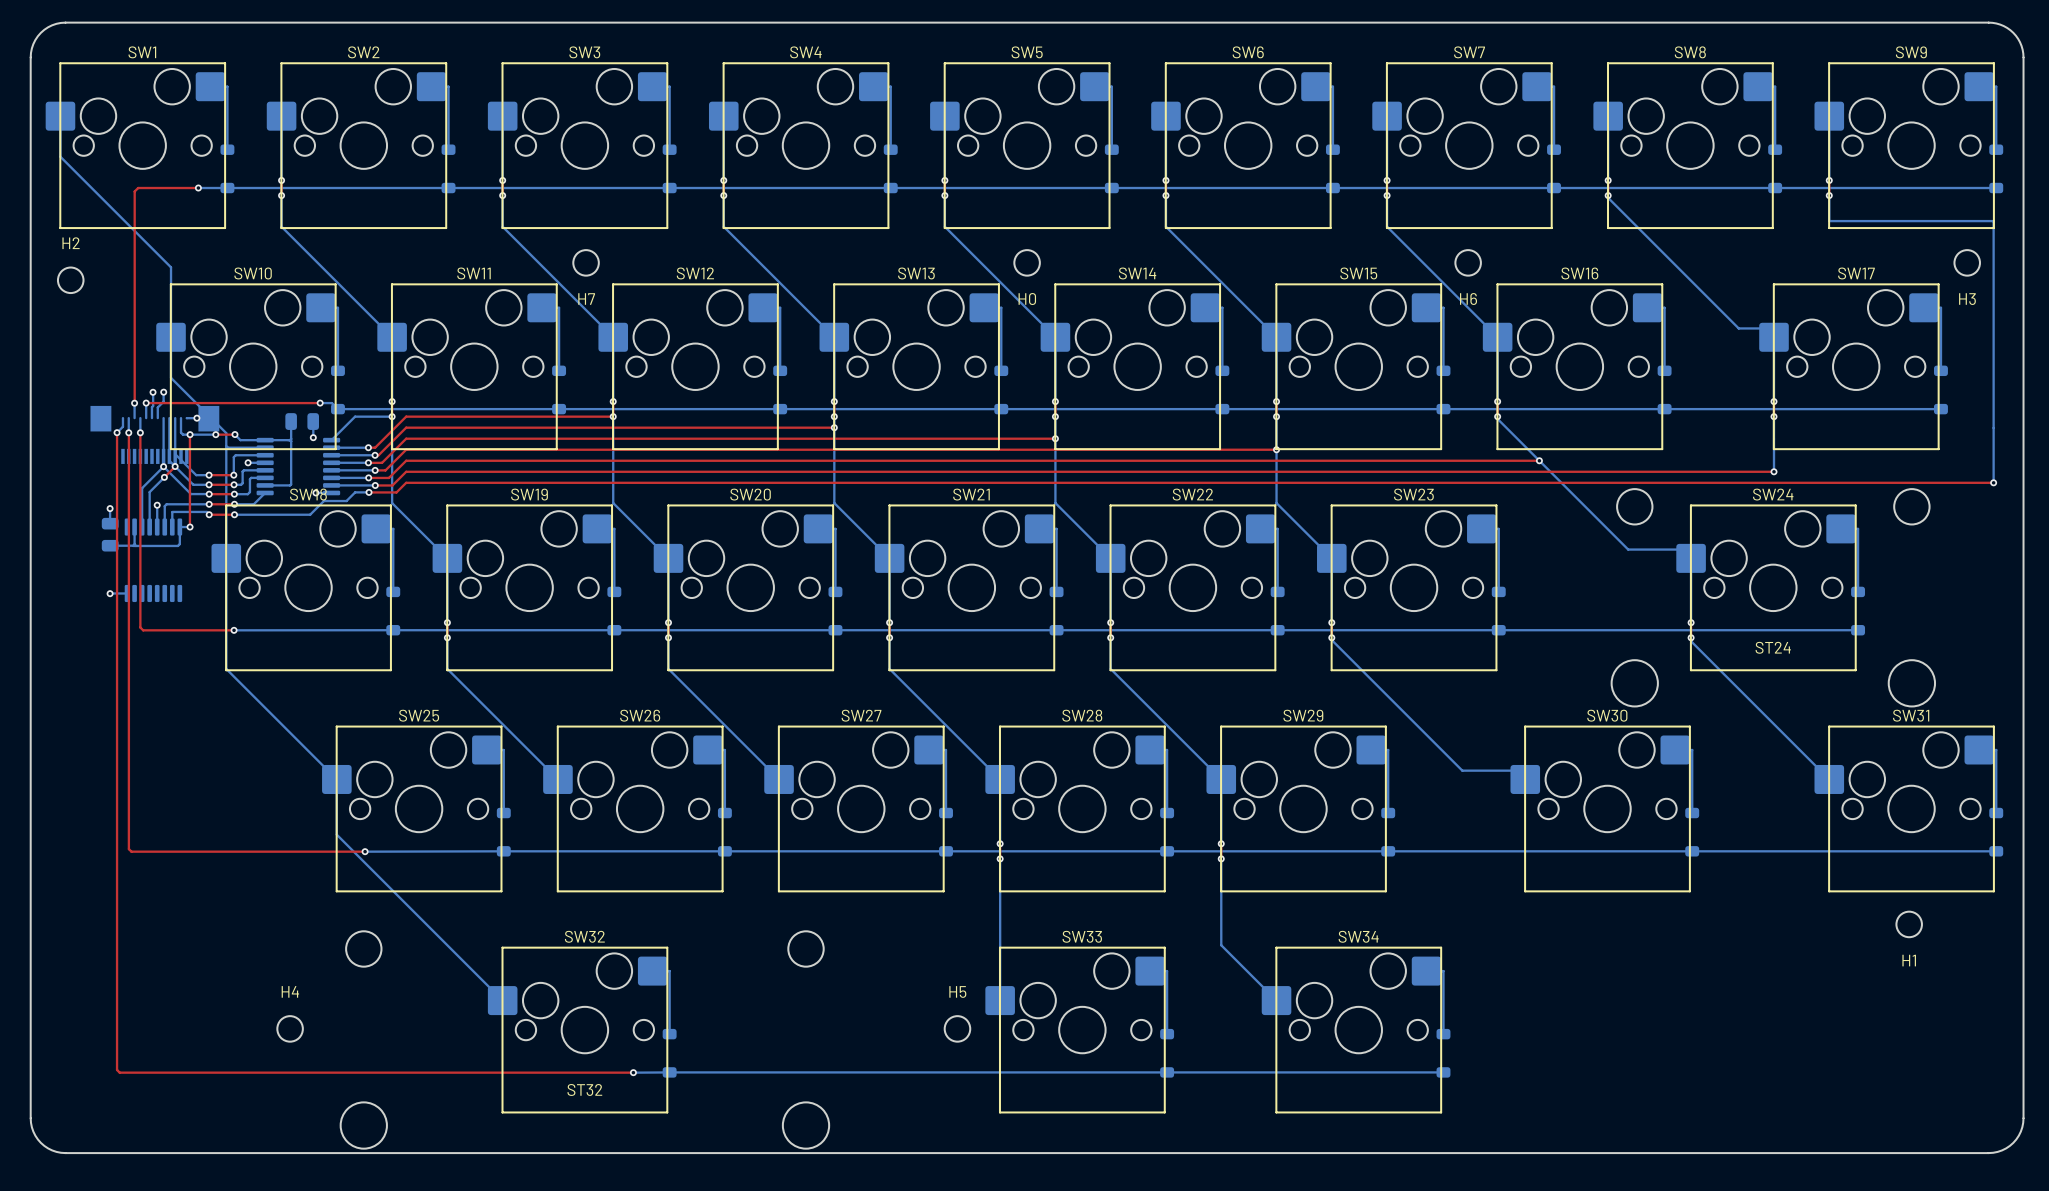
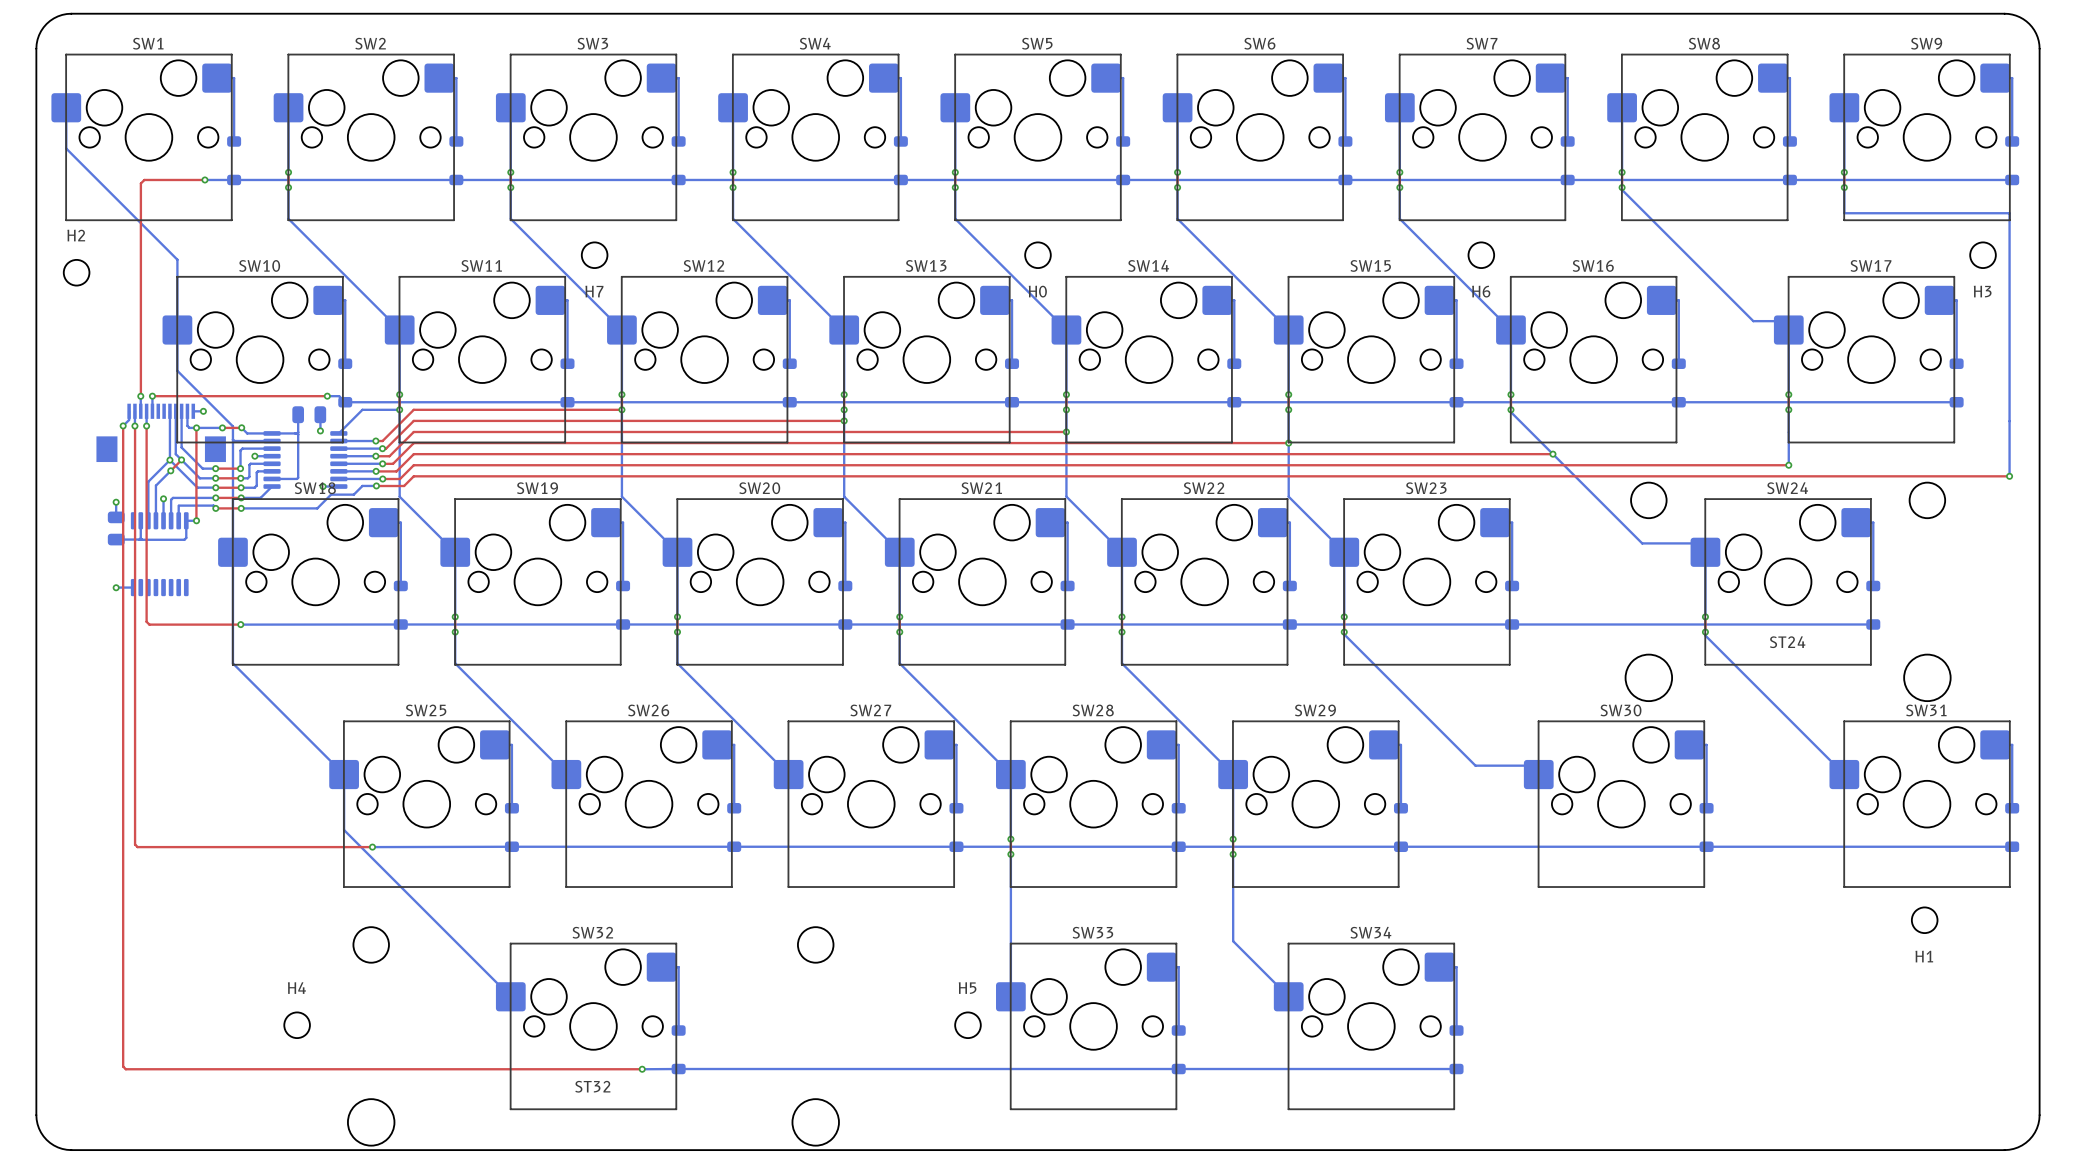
bottom track: (153, 392) (151, 418) -> none
via: (153, 392) -> none
bottom track: (163, 392) (163, 401) (157, 407) (157, 418) -> none
via: (163, 392) -> none
part rotation: 0° (154, 434) -> 180° (161, 432)

